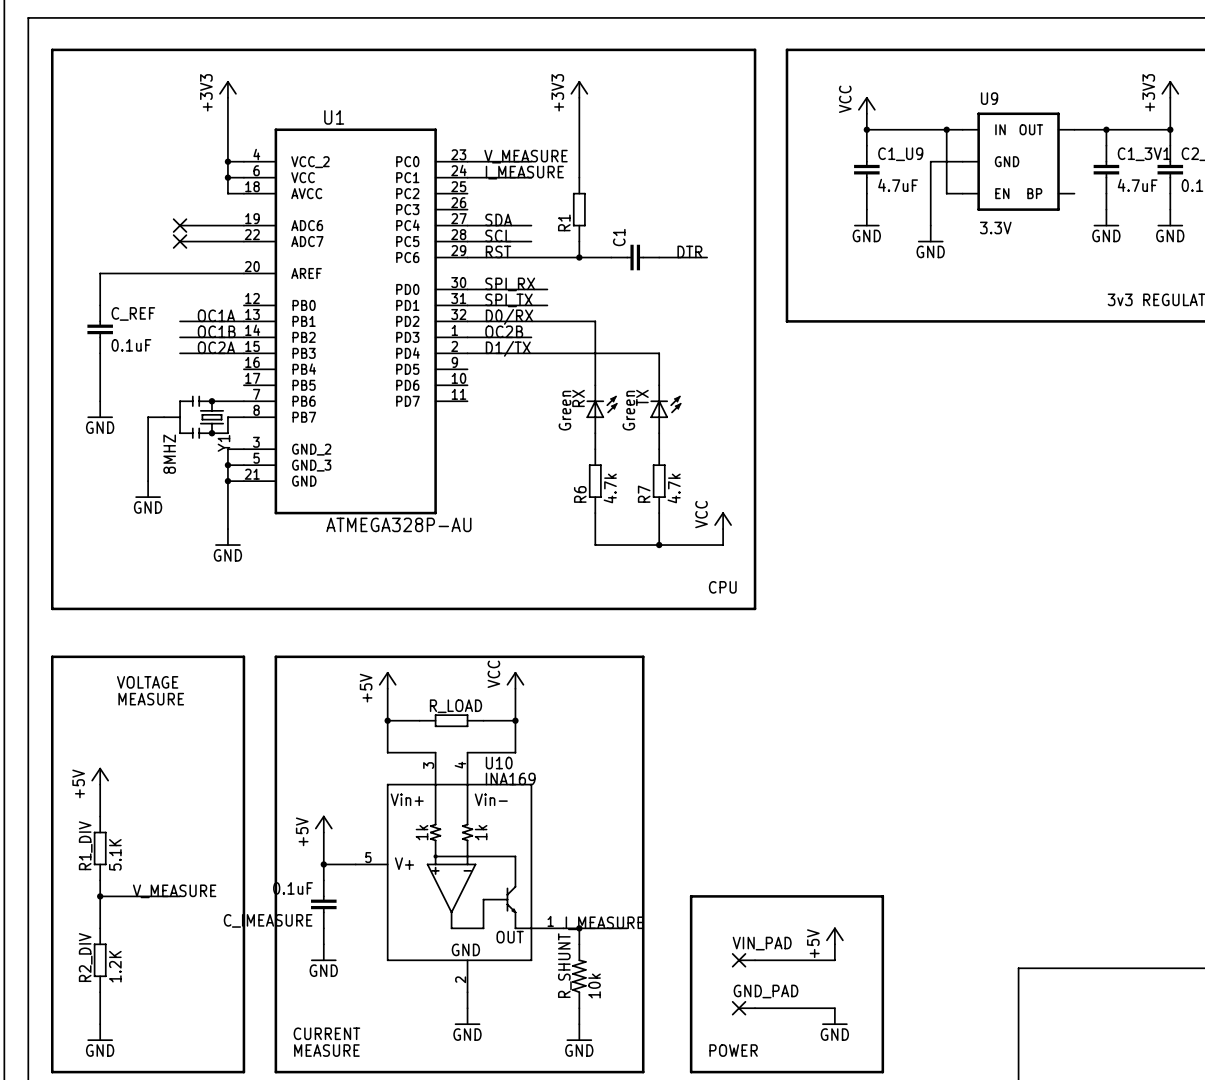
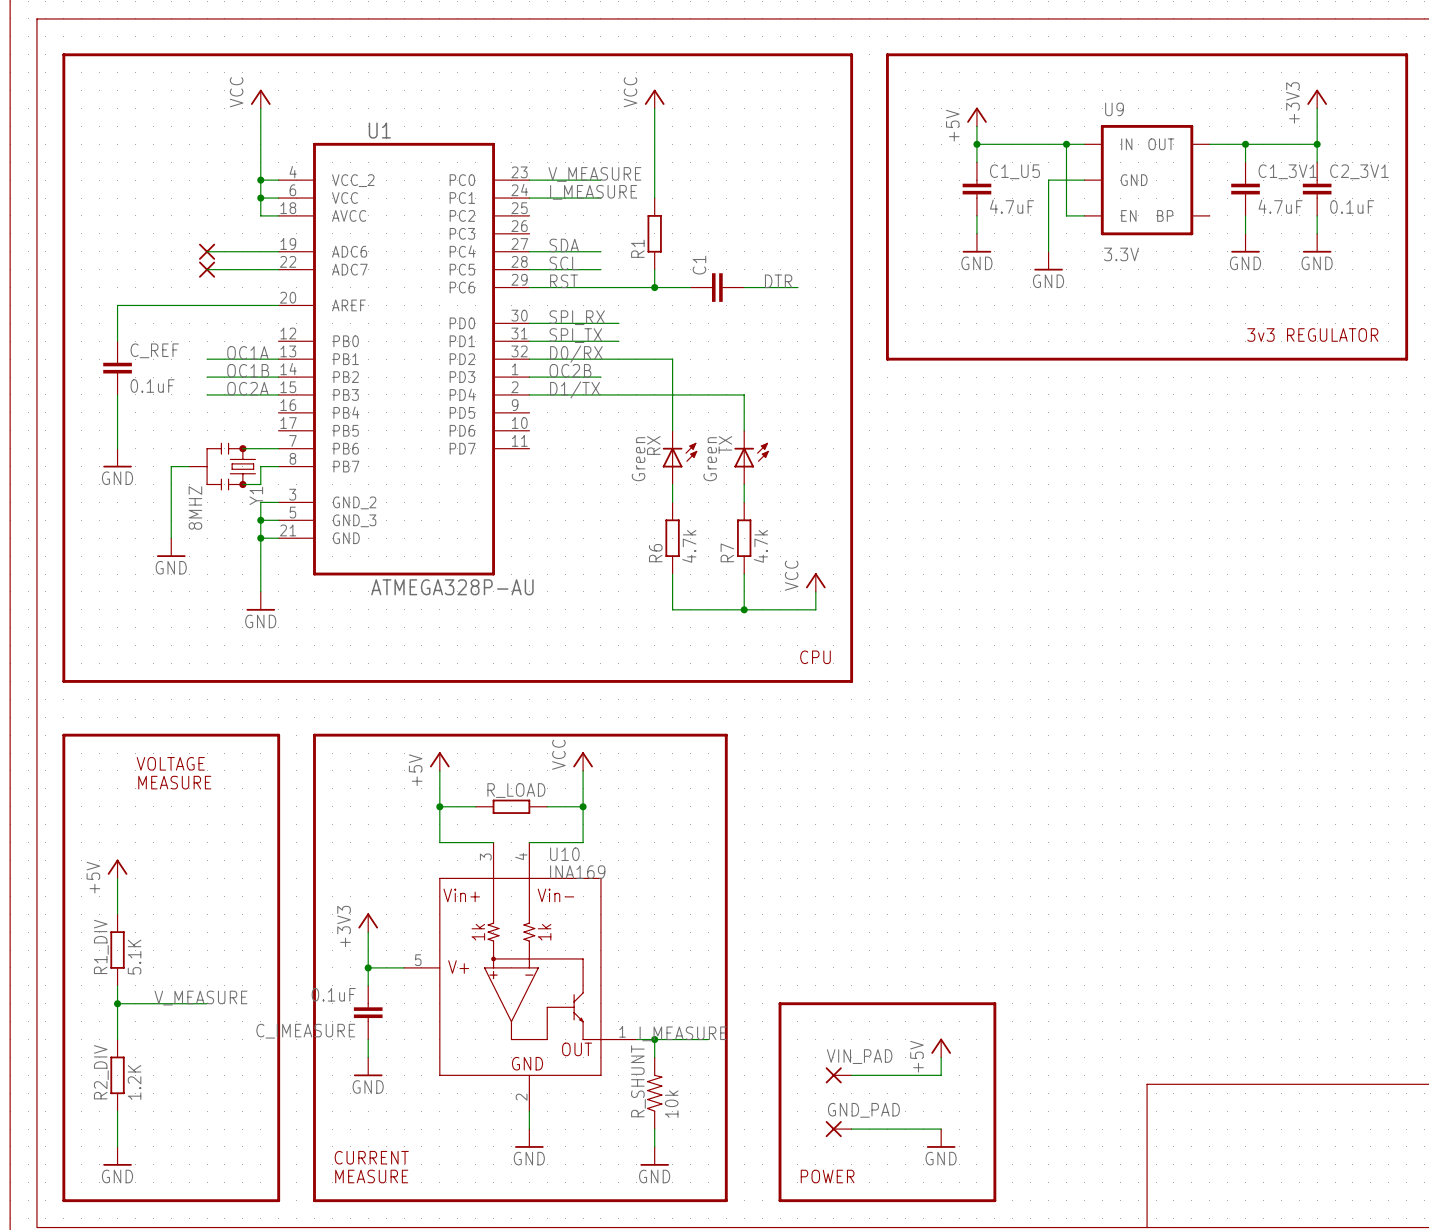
power symbol: +3V3 (227, 89) -> VCC (260, 99)
power symbol: +3V3 (579, 89) -> VCC (654, 99)
power symbol: VCC (866, 105) -> +5V (976, 117)
C1_U9 name: C1_U9 (900, 154) -> C1_U5 (1014, 171)
power symbol: +5V (323, 824) -> +3V3 (368, 922)

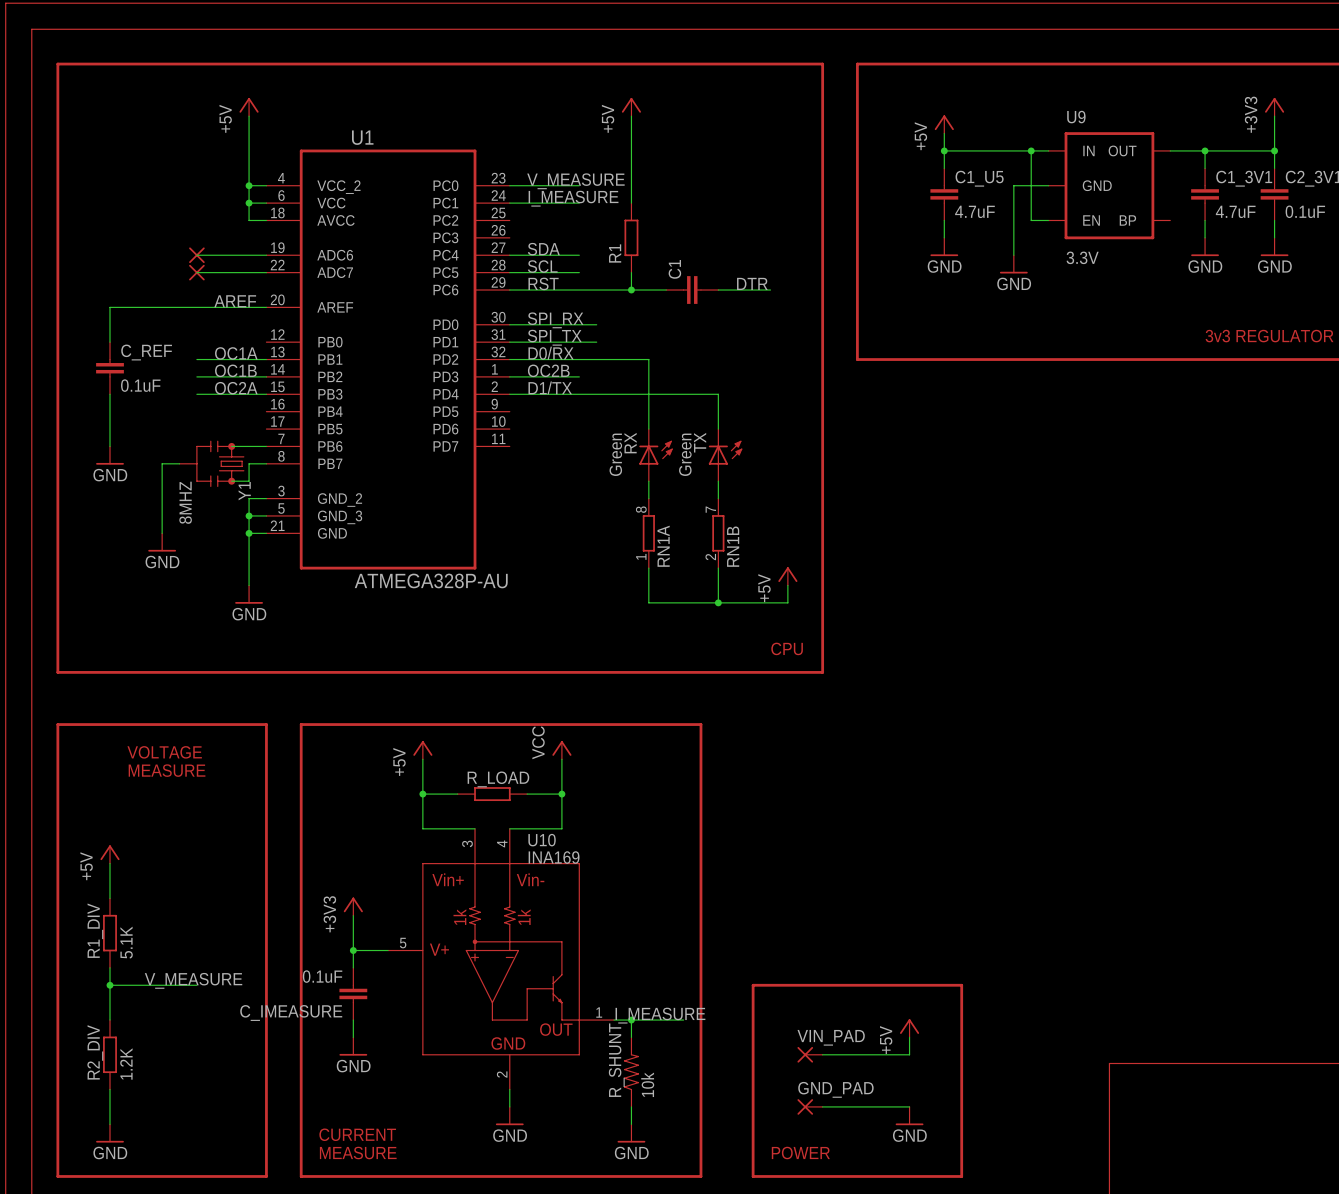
power symbol: VCC (260, 99) -> +5V (249, 107)
power symbol: VCC (654, 99) -> +5V (631, 107)
label: none -> AREF (235, 301)
R6: 4.7k (672, 538) -> none
RN1A: none -> (648, 533)
R7: 4.7k (744, 538) -> none
RN1B: none -> (718, 533)
power symbol: VCC (815, 582) -> +5V (787, 576)

